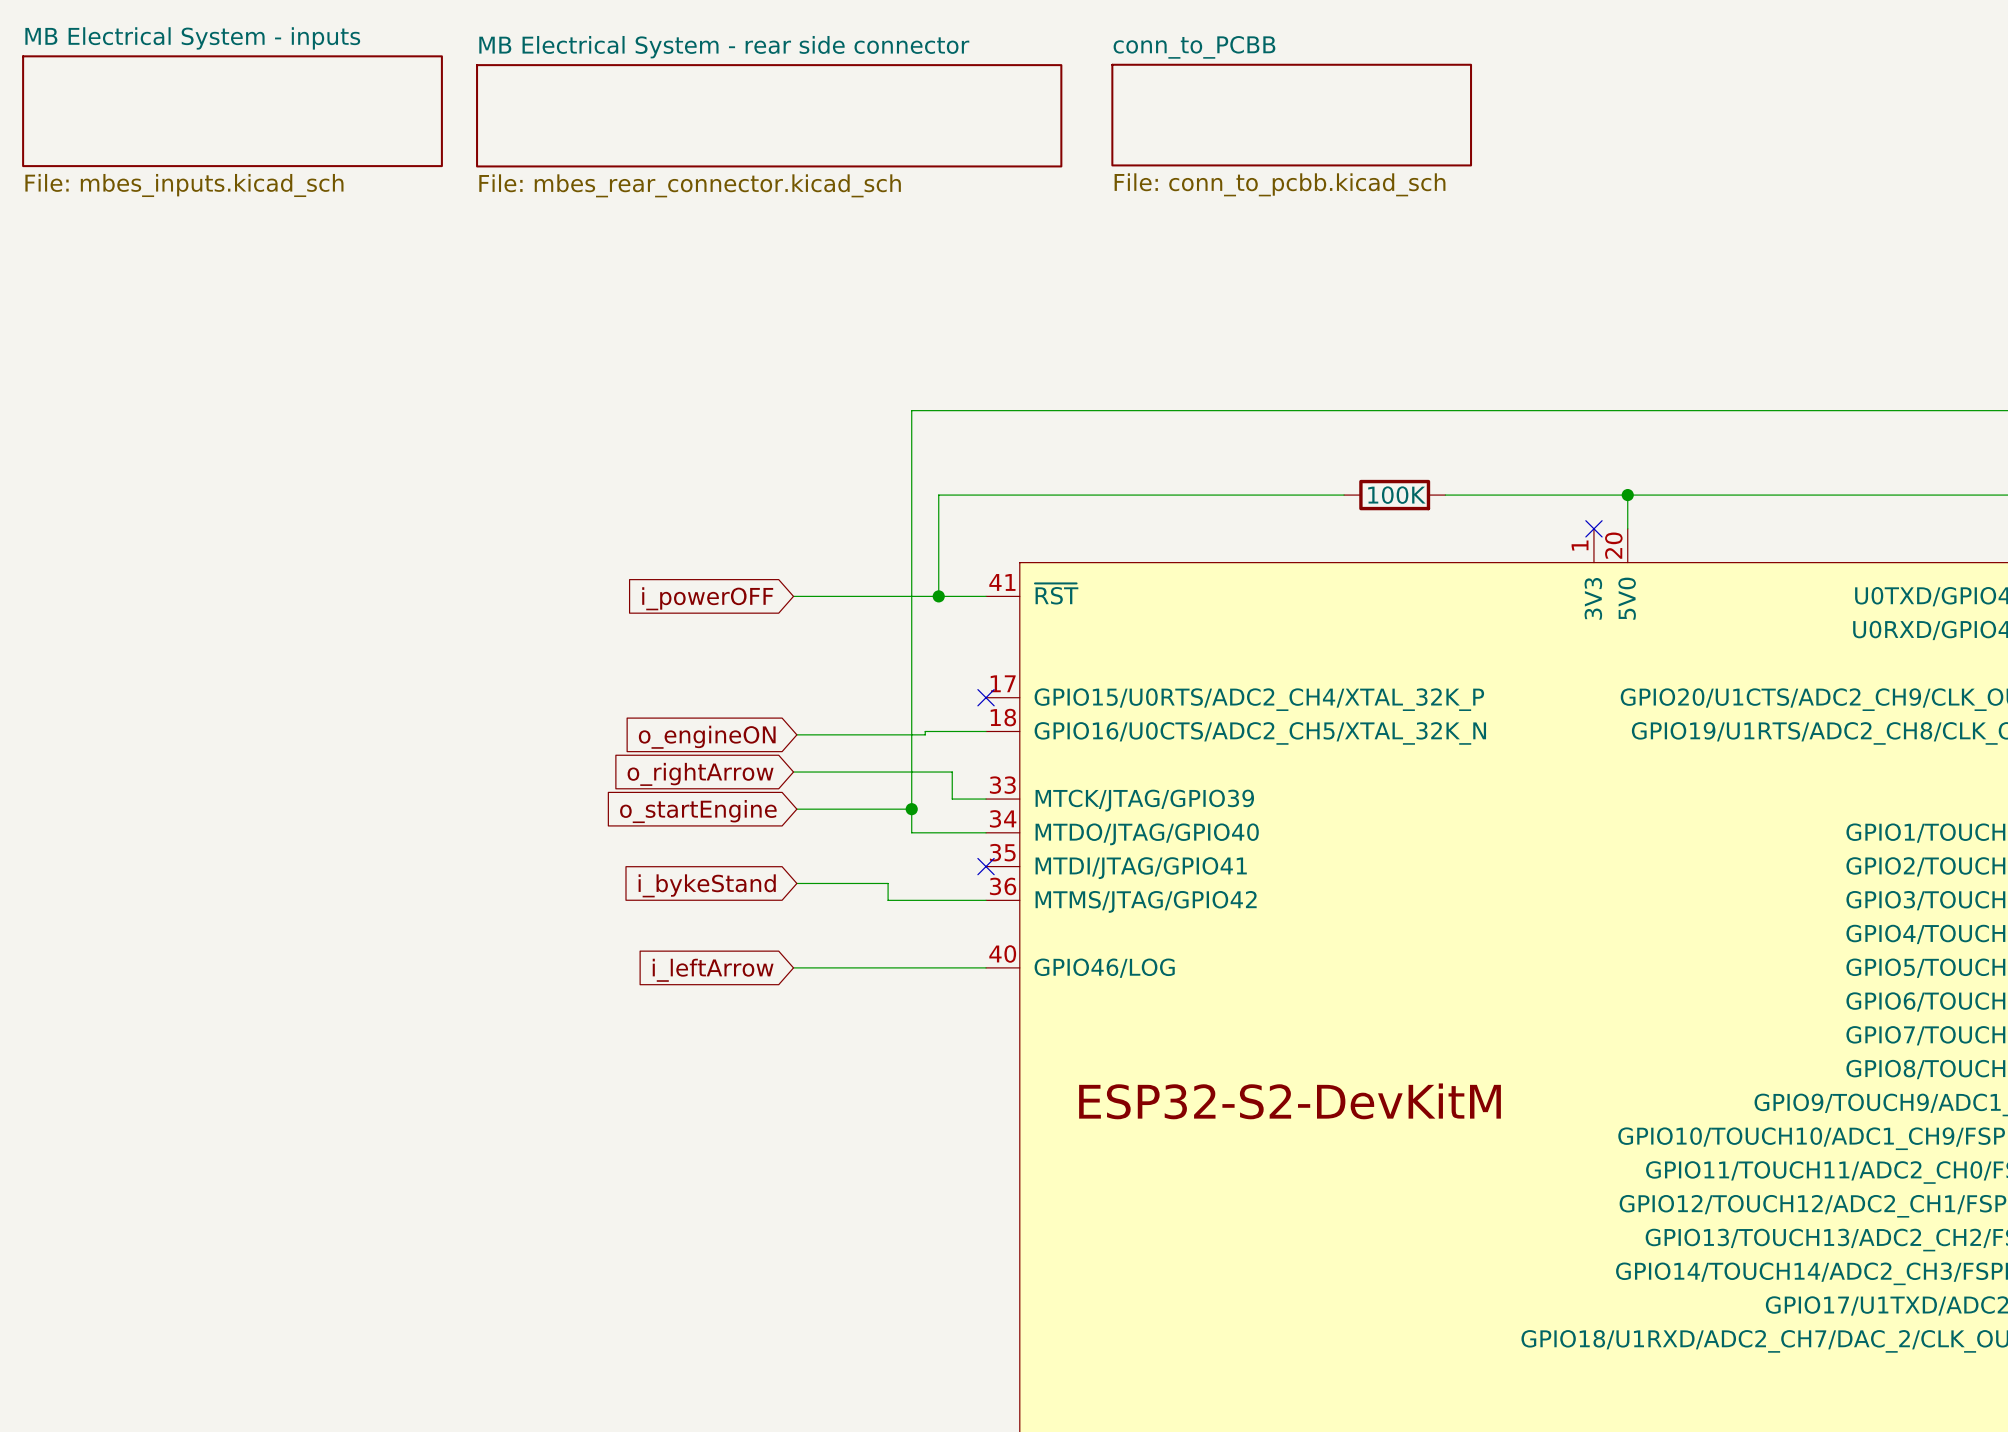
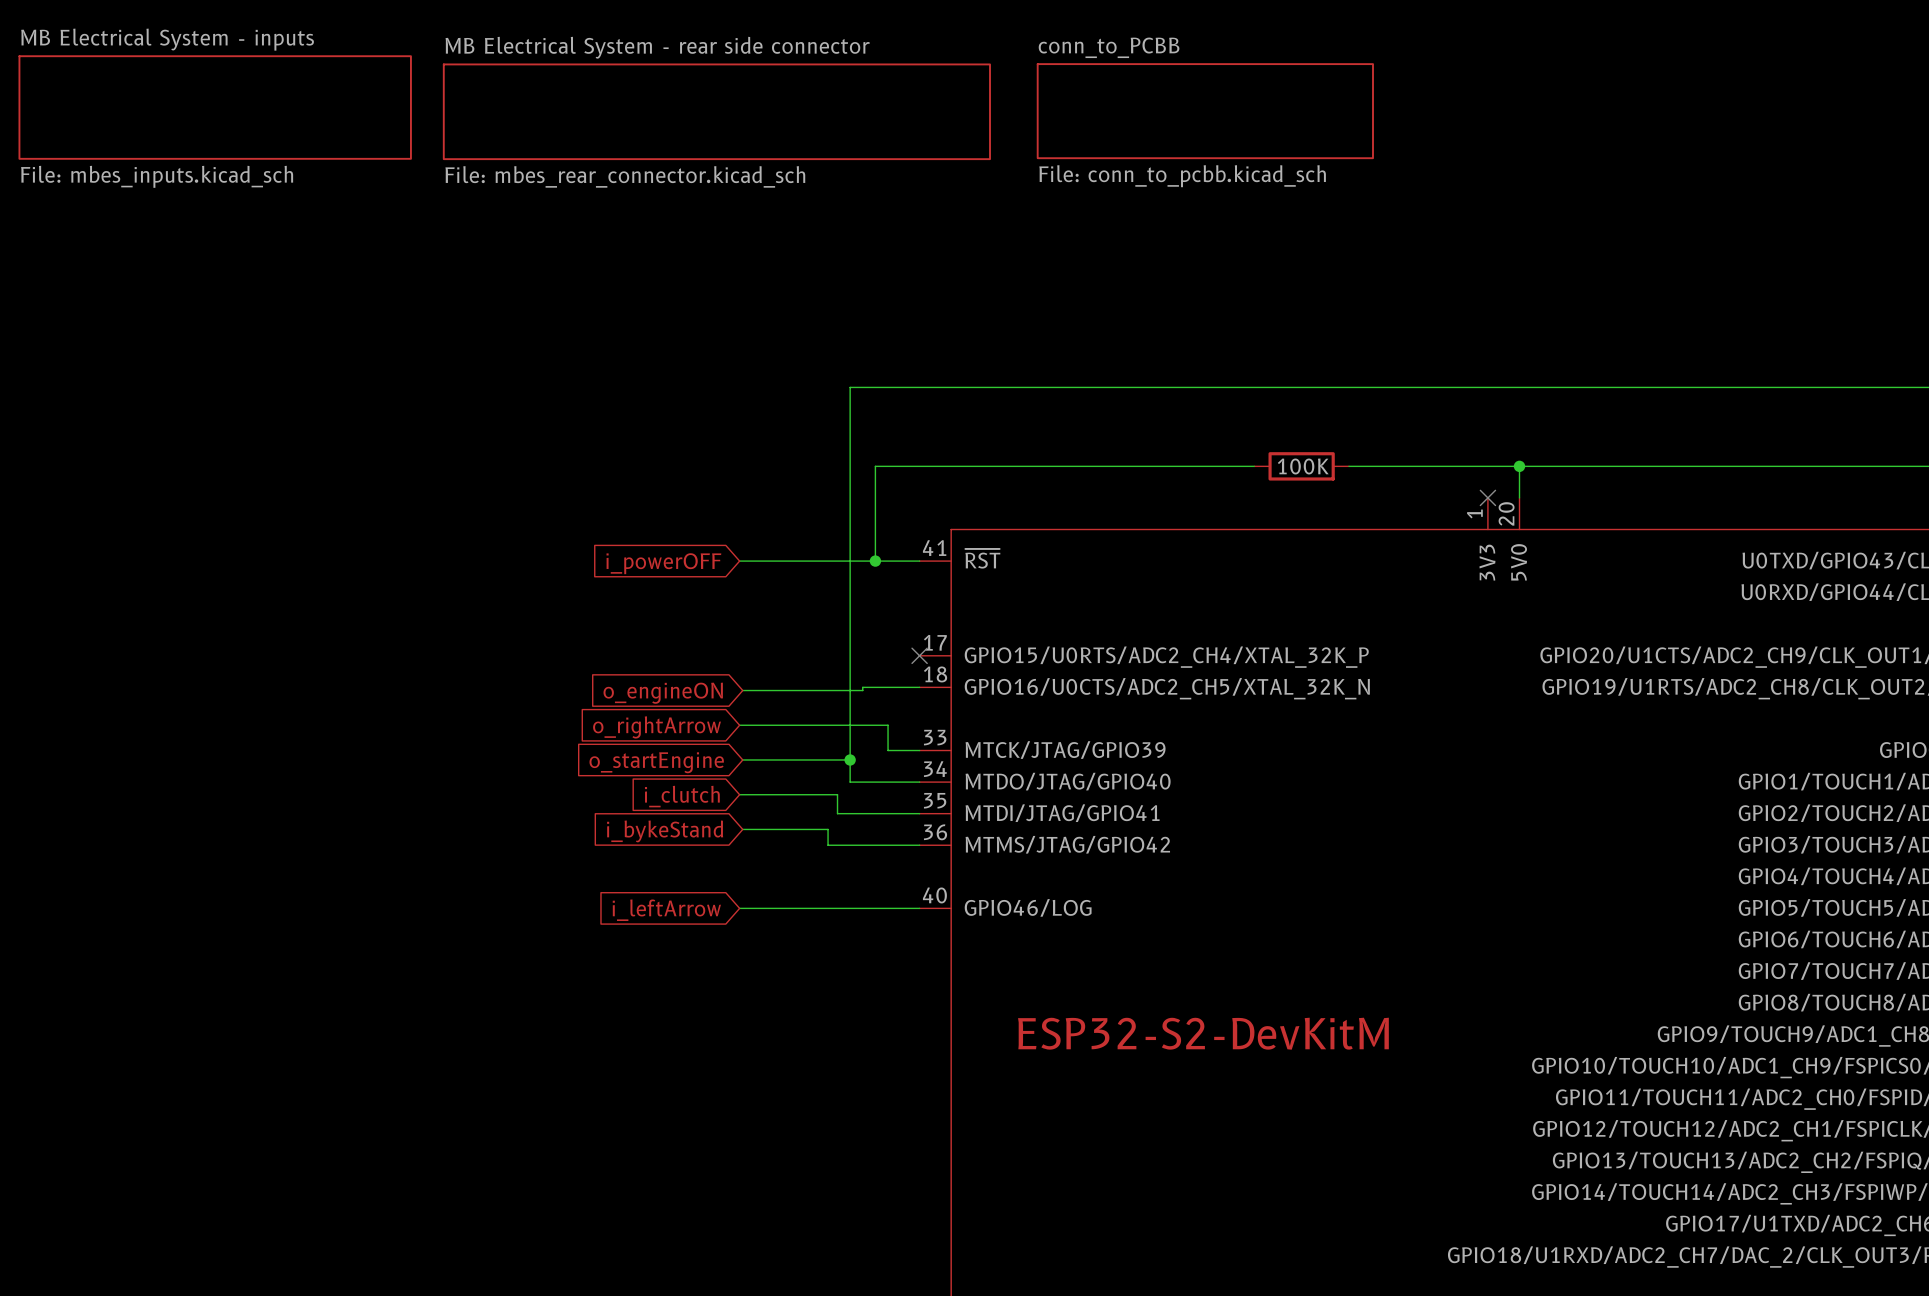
wire: none -> (739, 794) (837, 794) (837, 813) (919, 813)
global label: none -> i_clutch (682, 796)
no-connect mark: (986, 866) -> none

